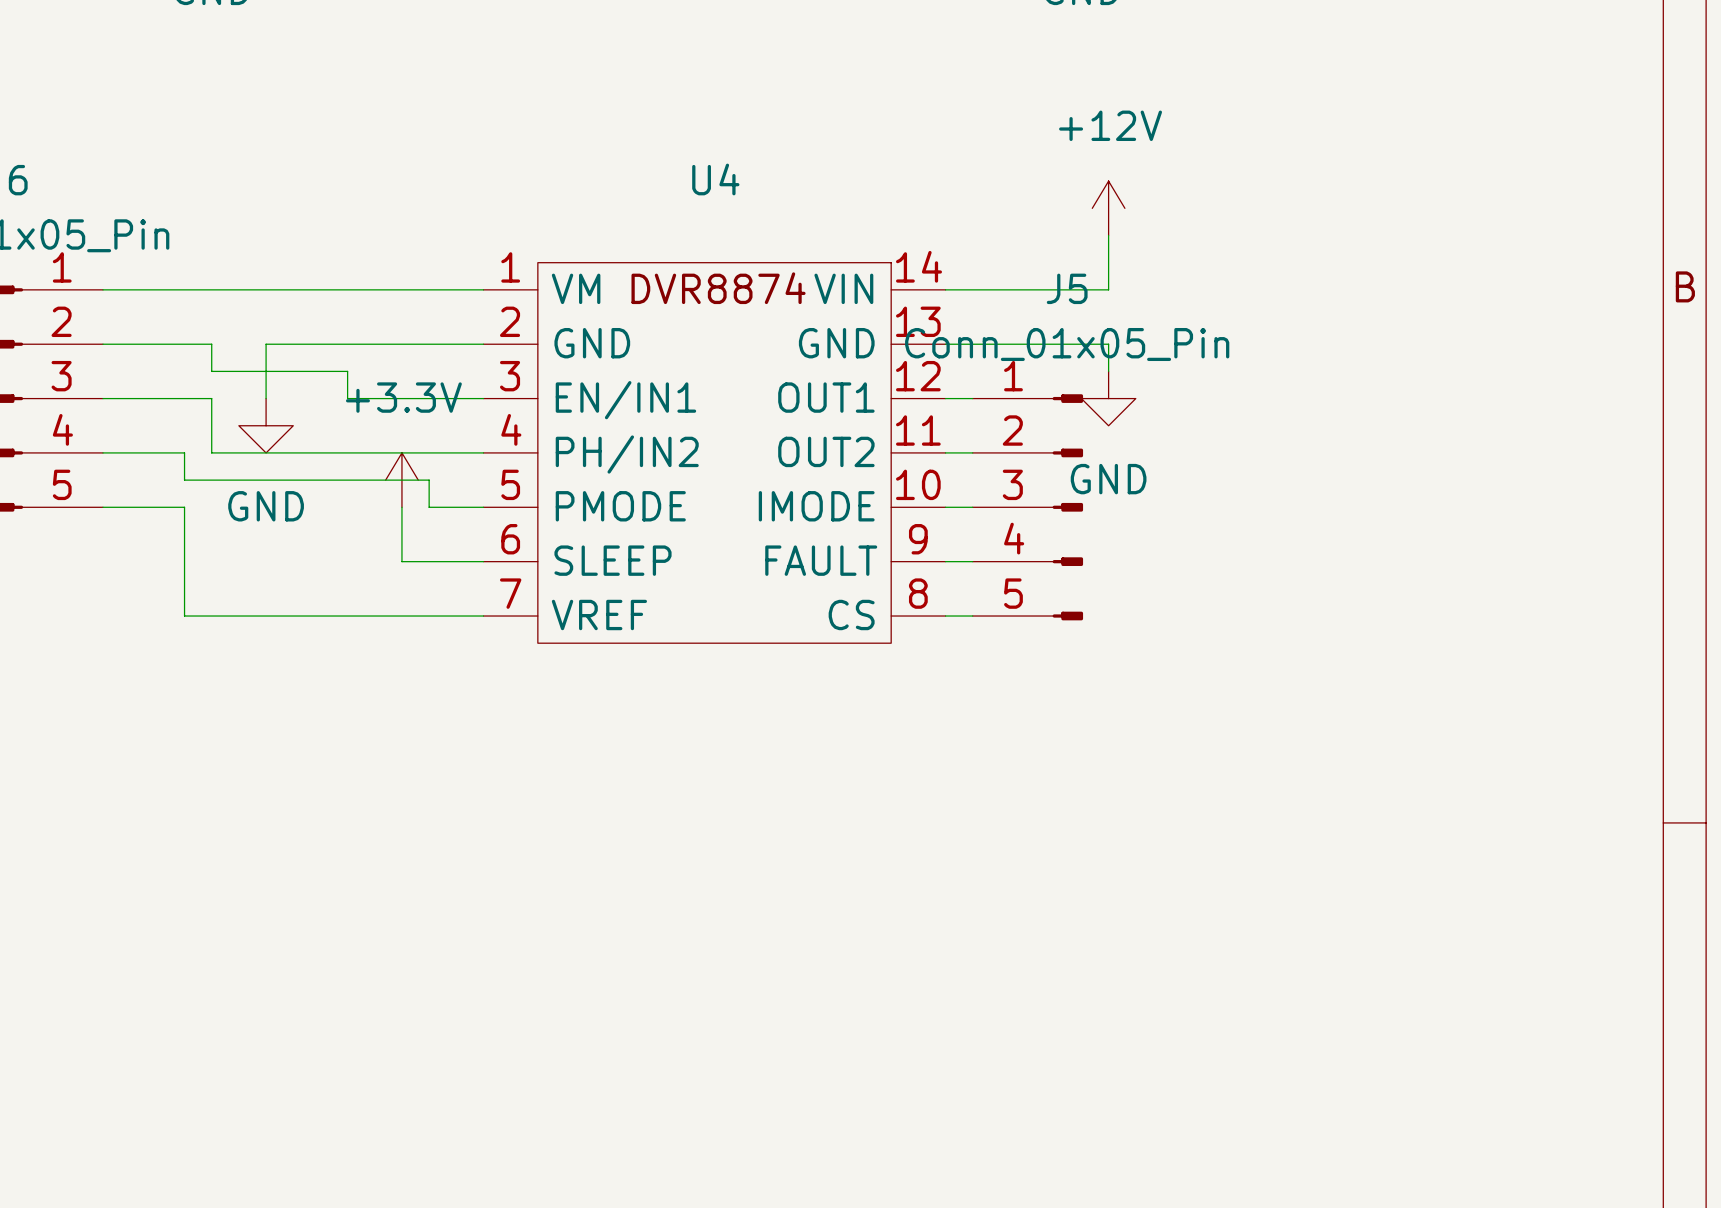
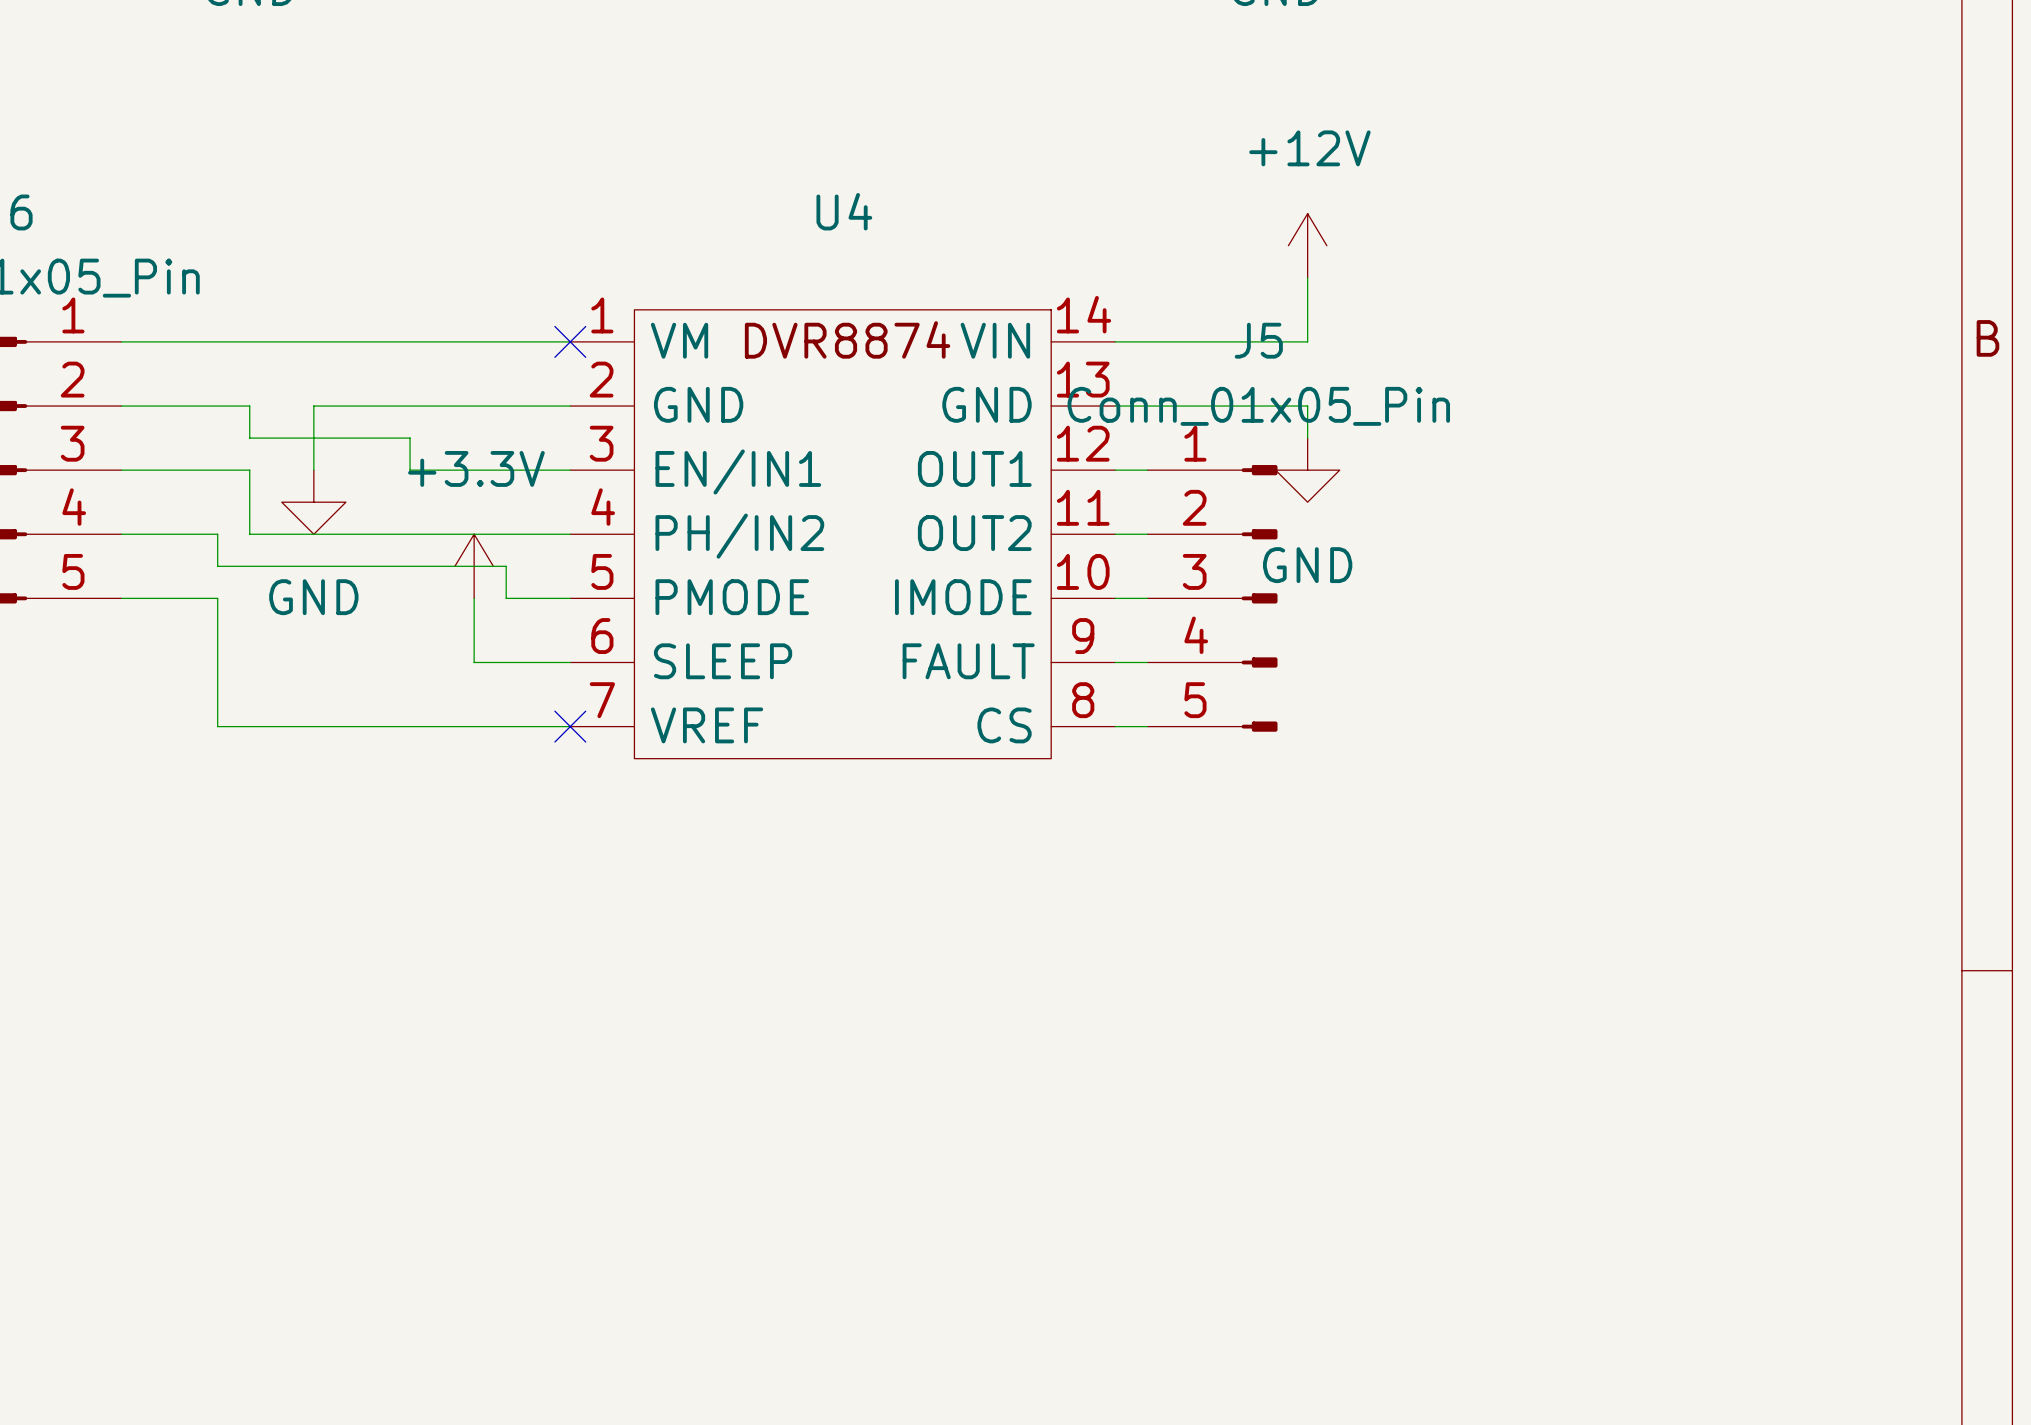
no-connect mark: none -> (570, 341)
no-connect mark: none -> (570, 726)

